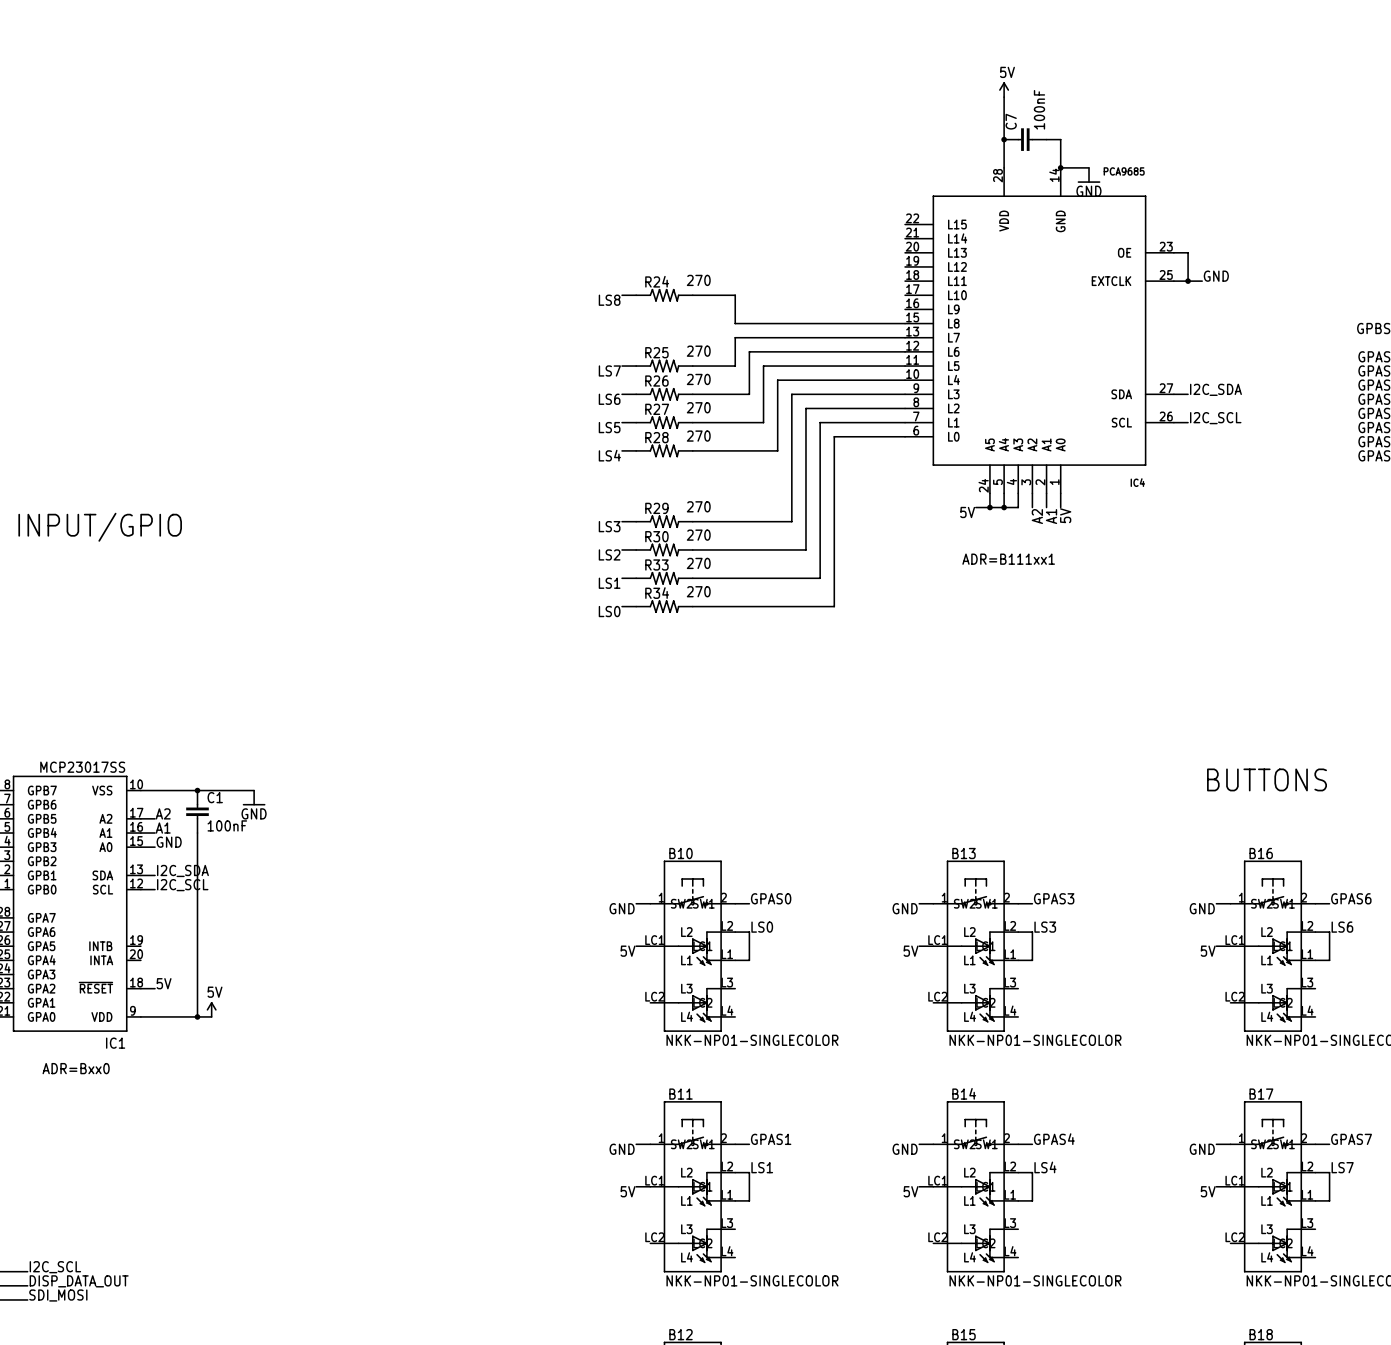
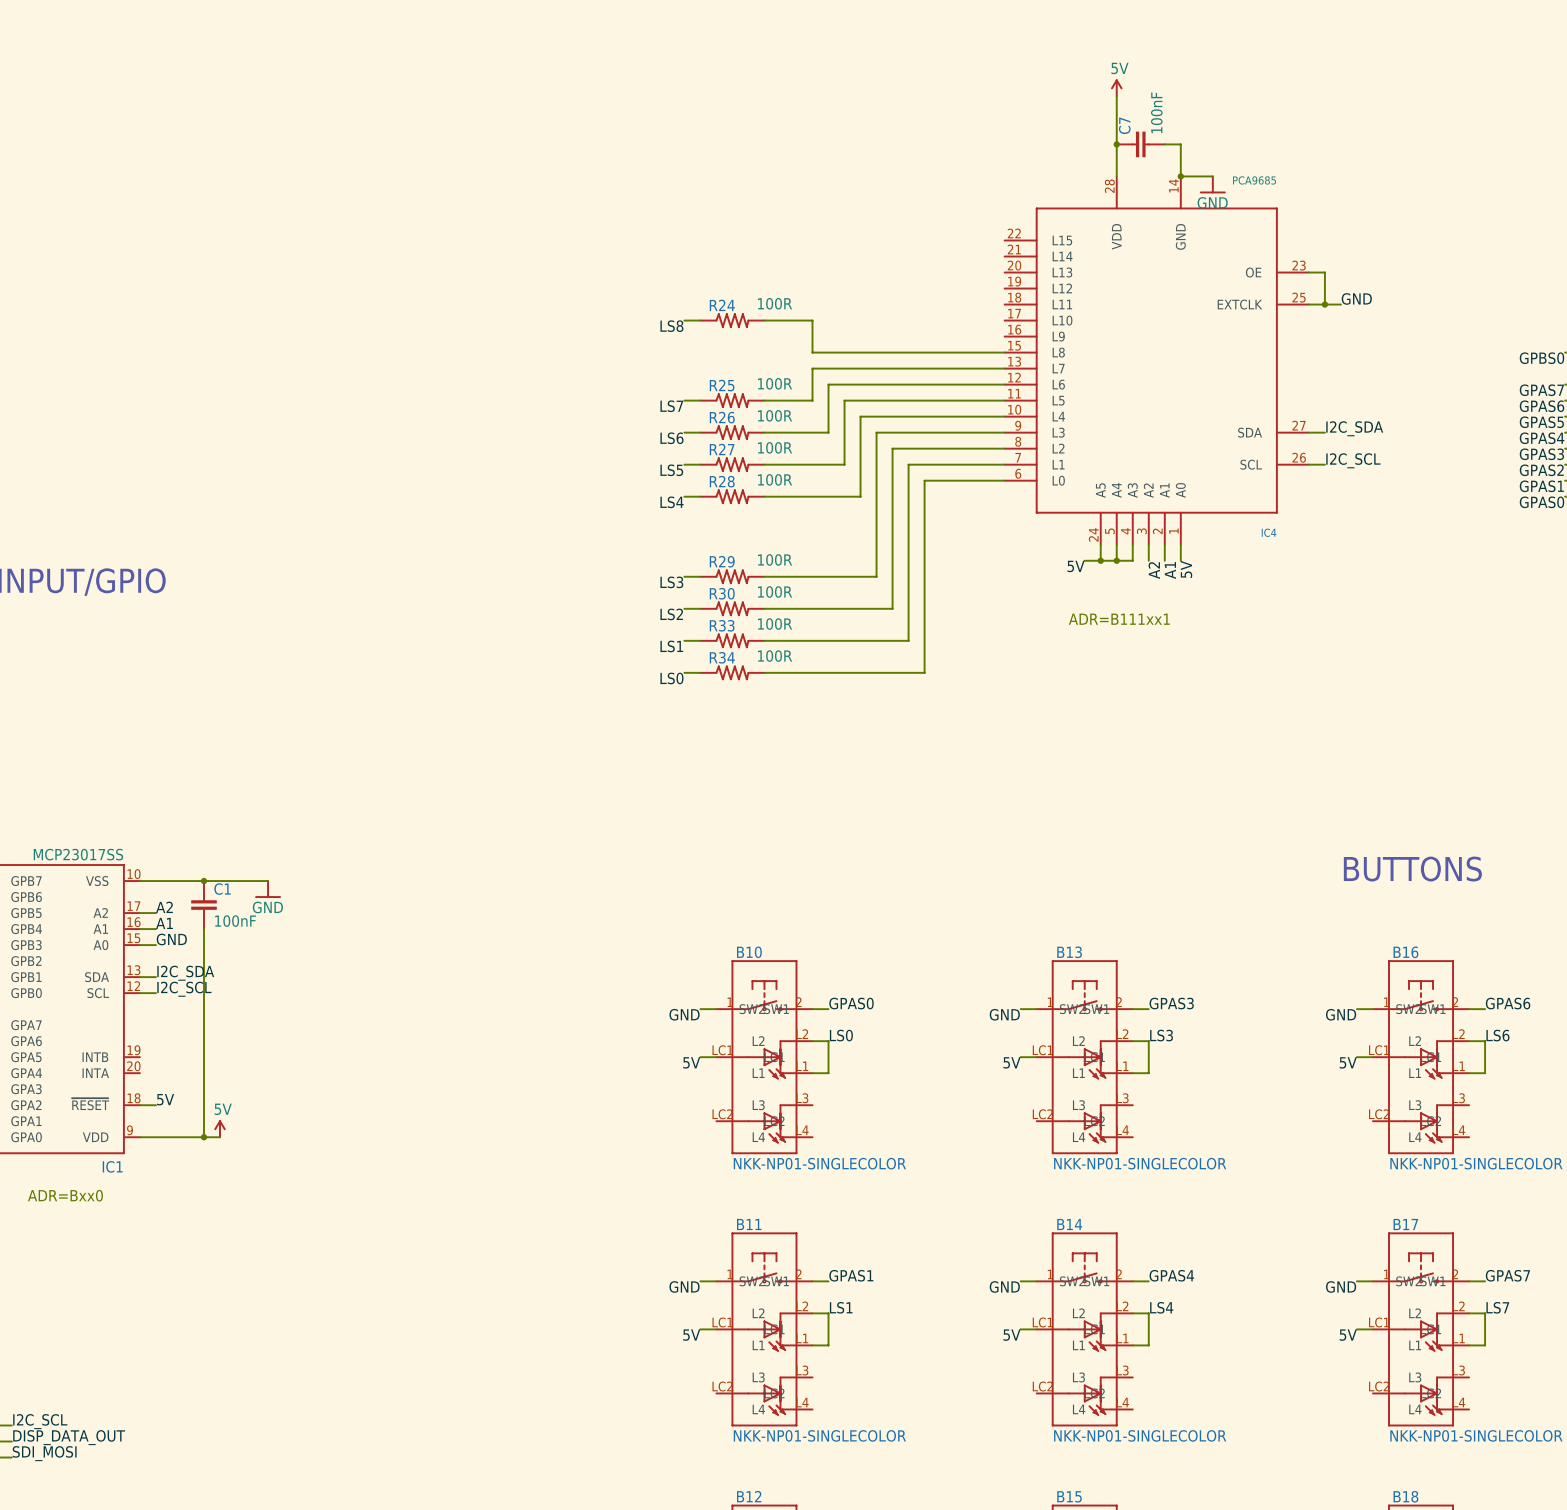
R24 value: 270 (698, 280) -> 100R (775, 303)
R25 value: 270 (698, 351) -> 100R (775, 383)
R26 value: 270 (698, 379) -> 100R (775, 415)
R27 value: 270 (698, 407) -> 100R (775, 447)
R28 value: 270 (698, 436) -> 100R (775, 479)
R29 value: 270 (698, 506) -> 100R (775, 559)
R30 value: 270 (698, 535) -> 100R (775, 592)
R33 value: 270 (698, 563) -> 100R (775, 624)
R34 value: 270 (698, 591) -> 100R (775, 656)

